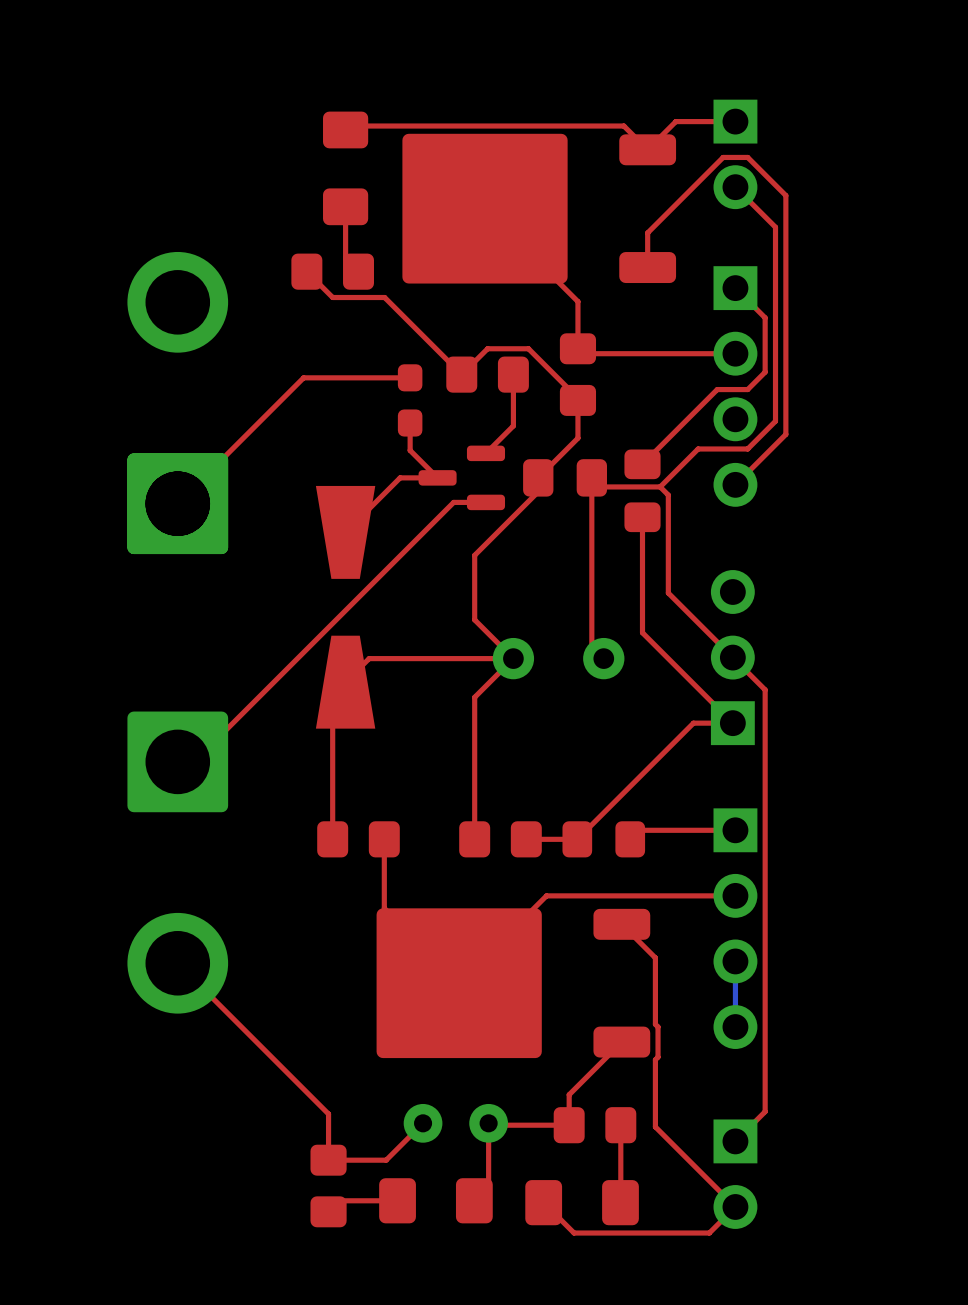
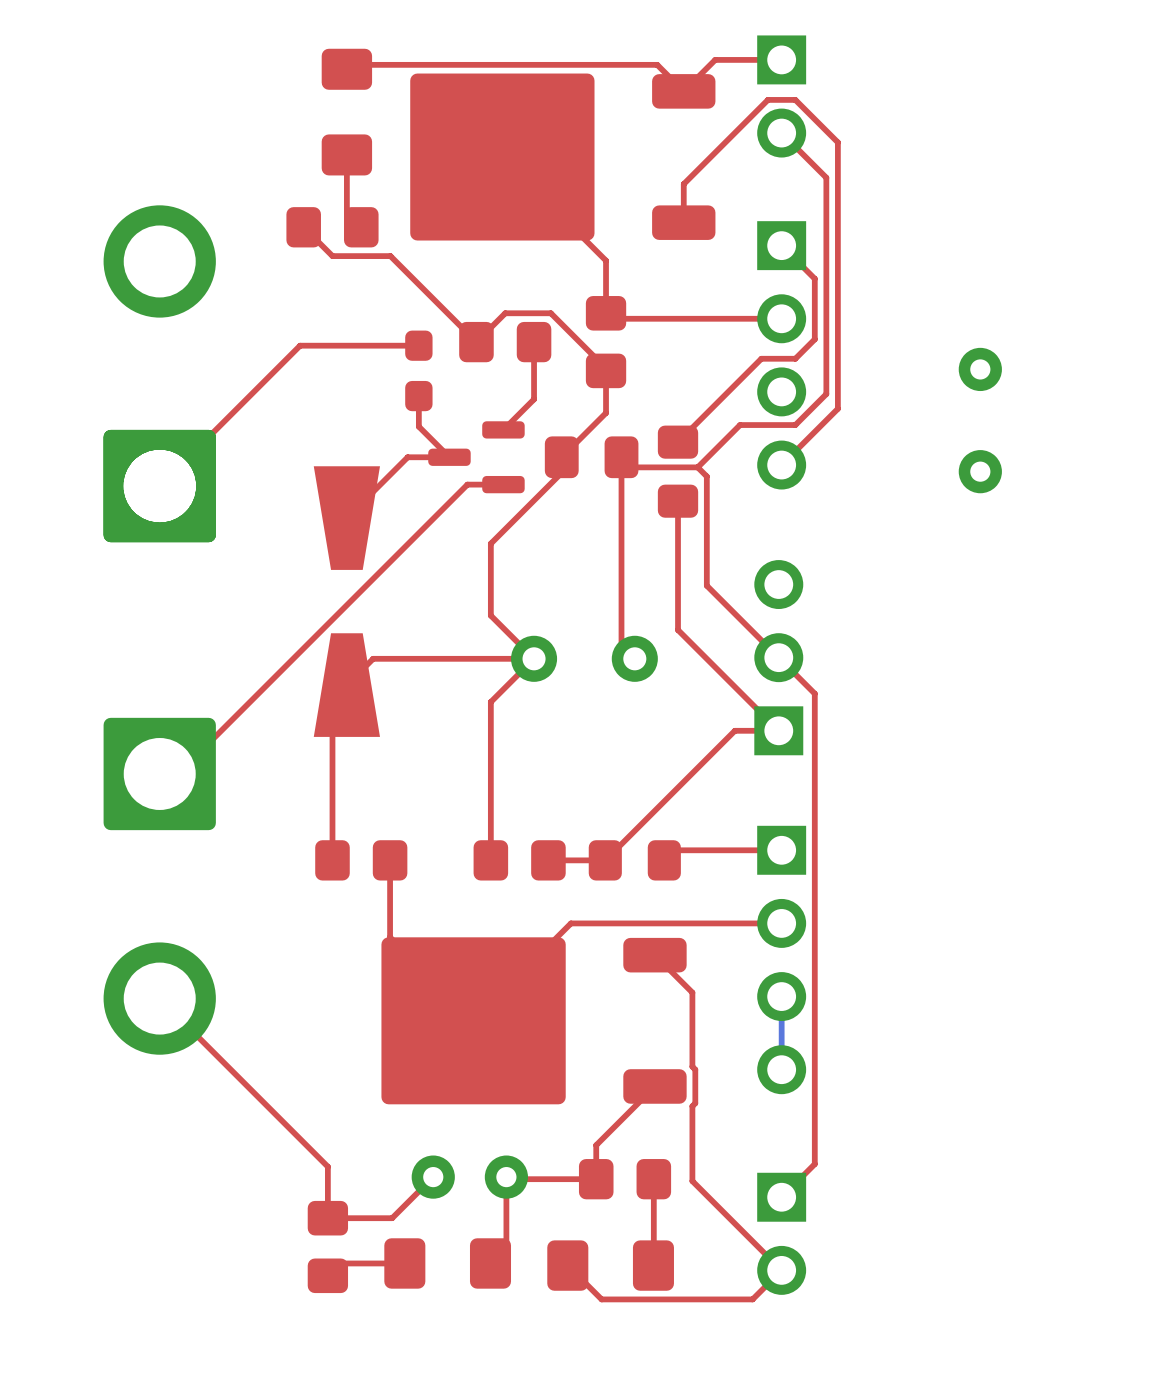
part: none -> (980, 369)
part: none -> (980, 471)

